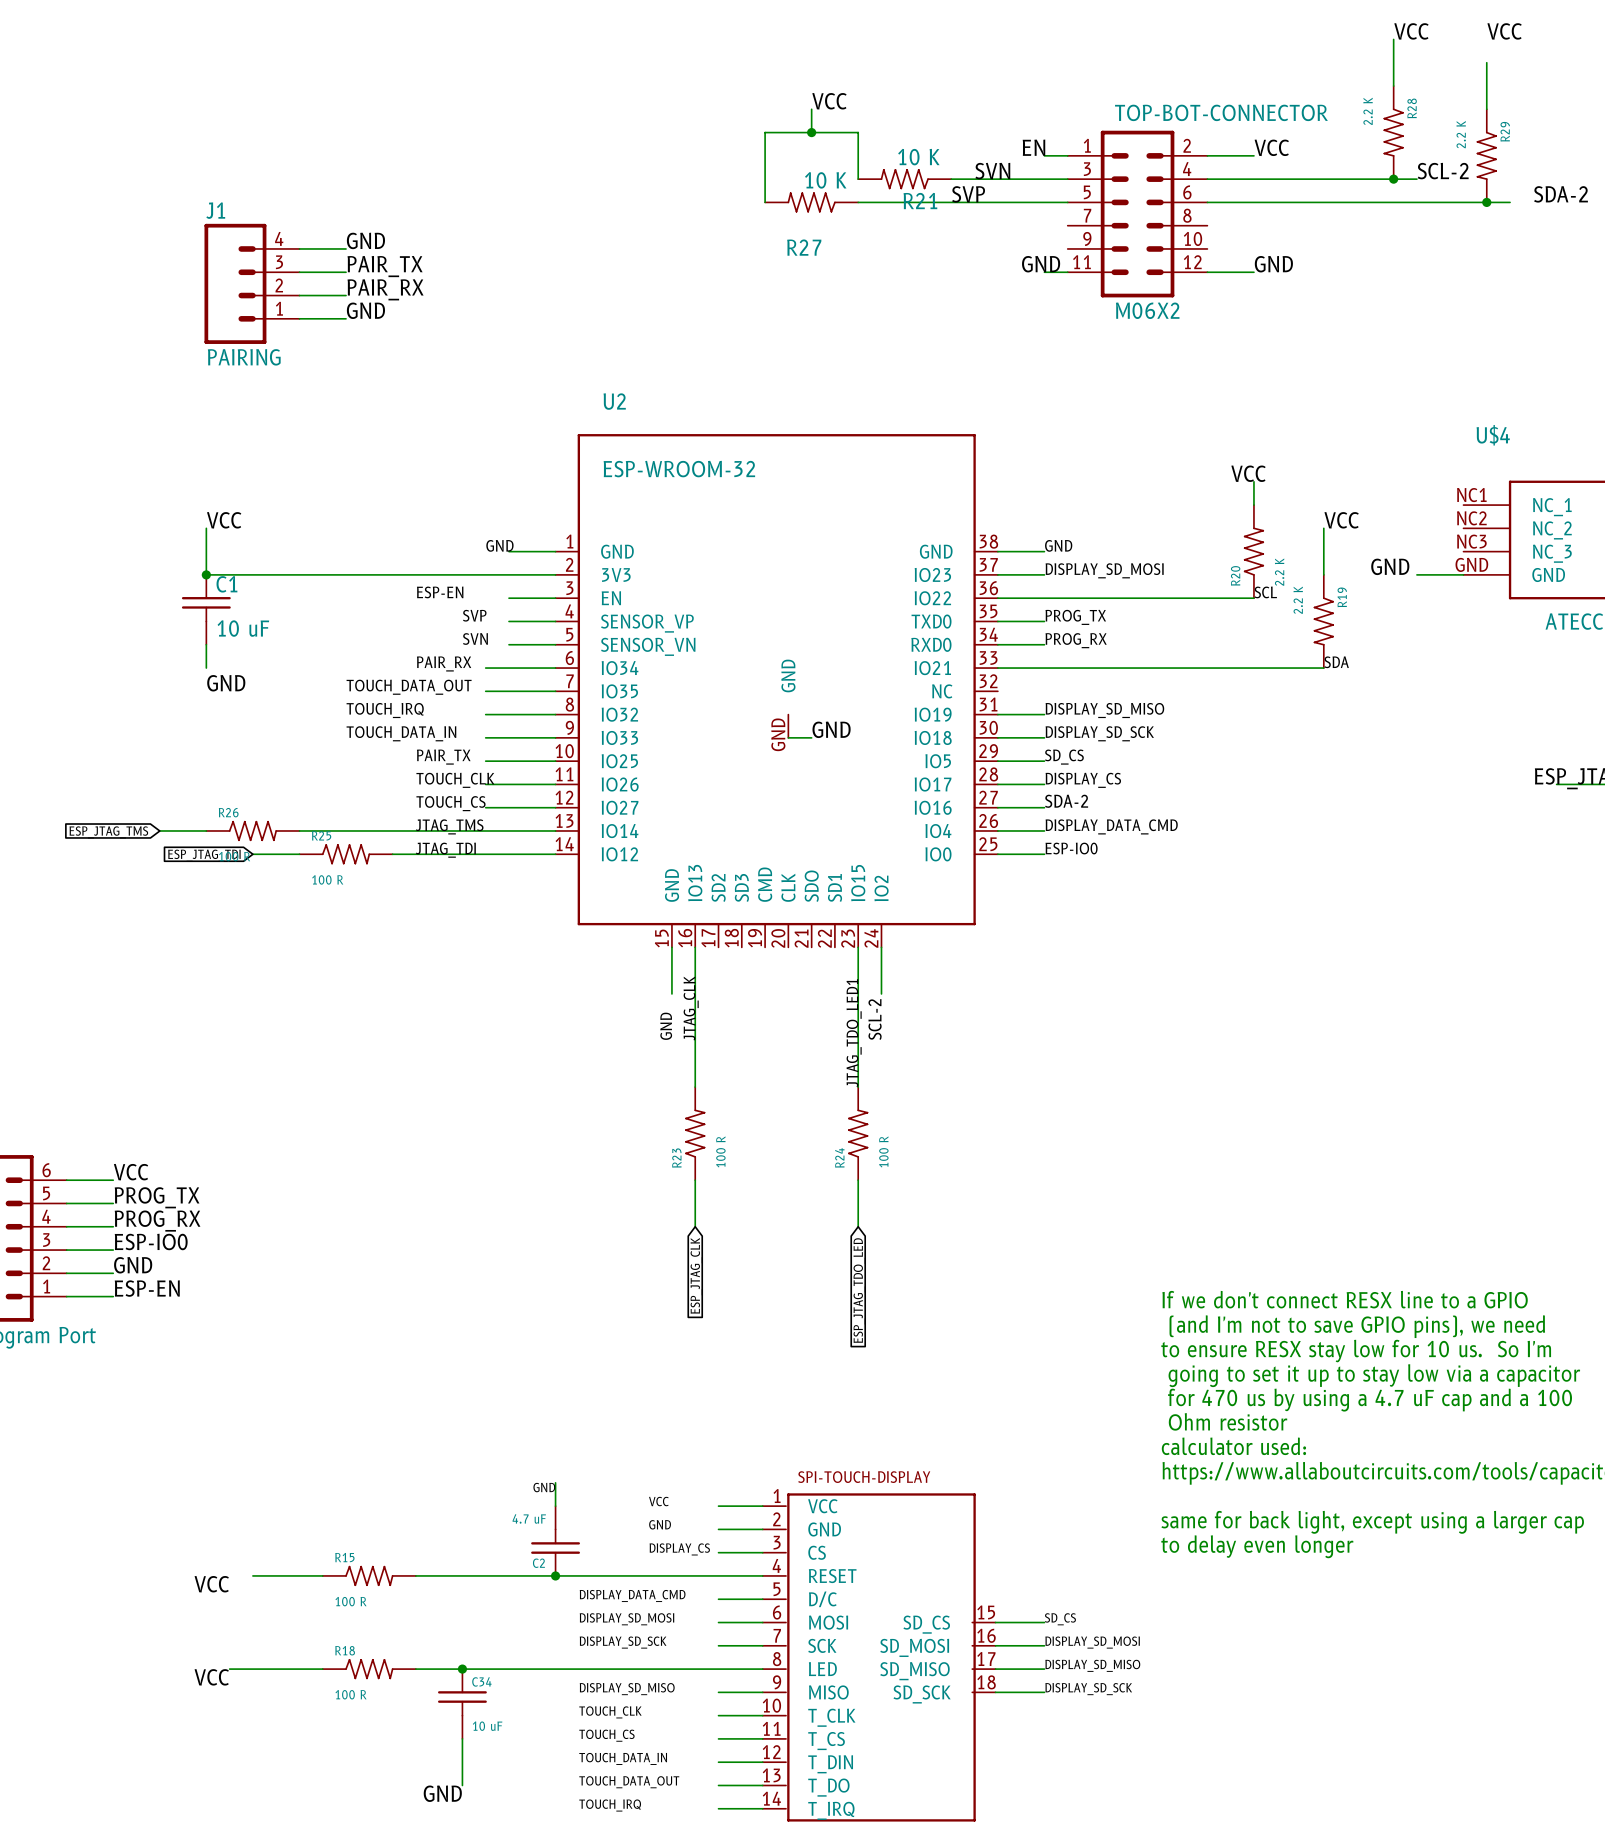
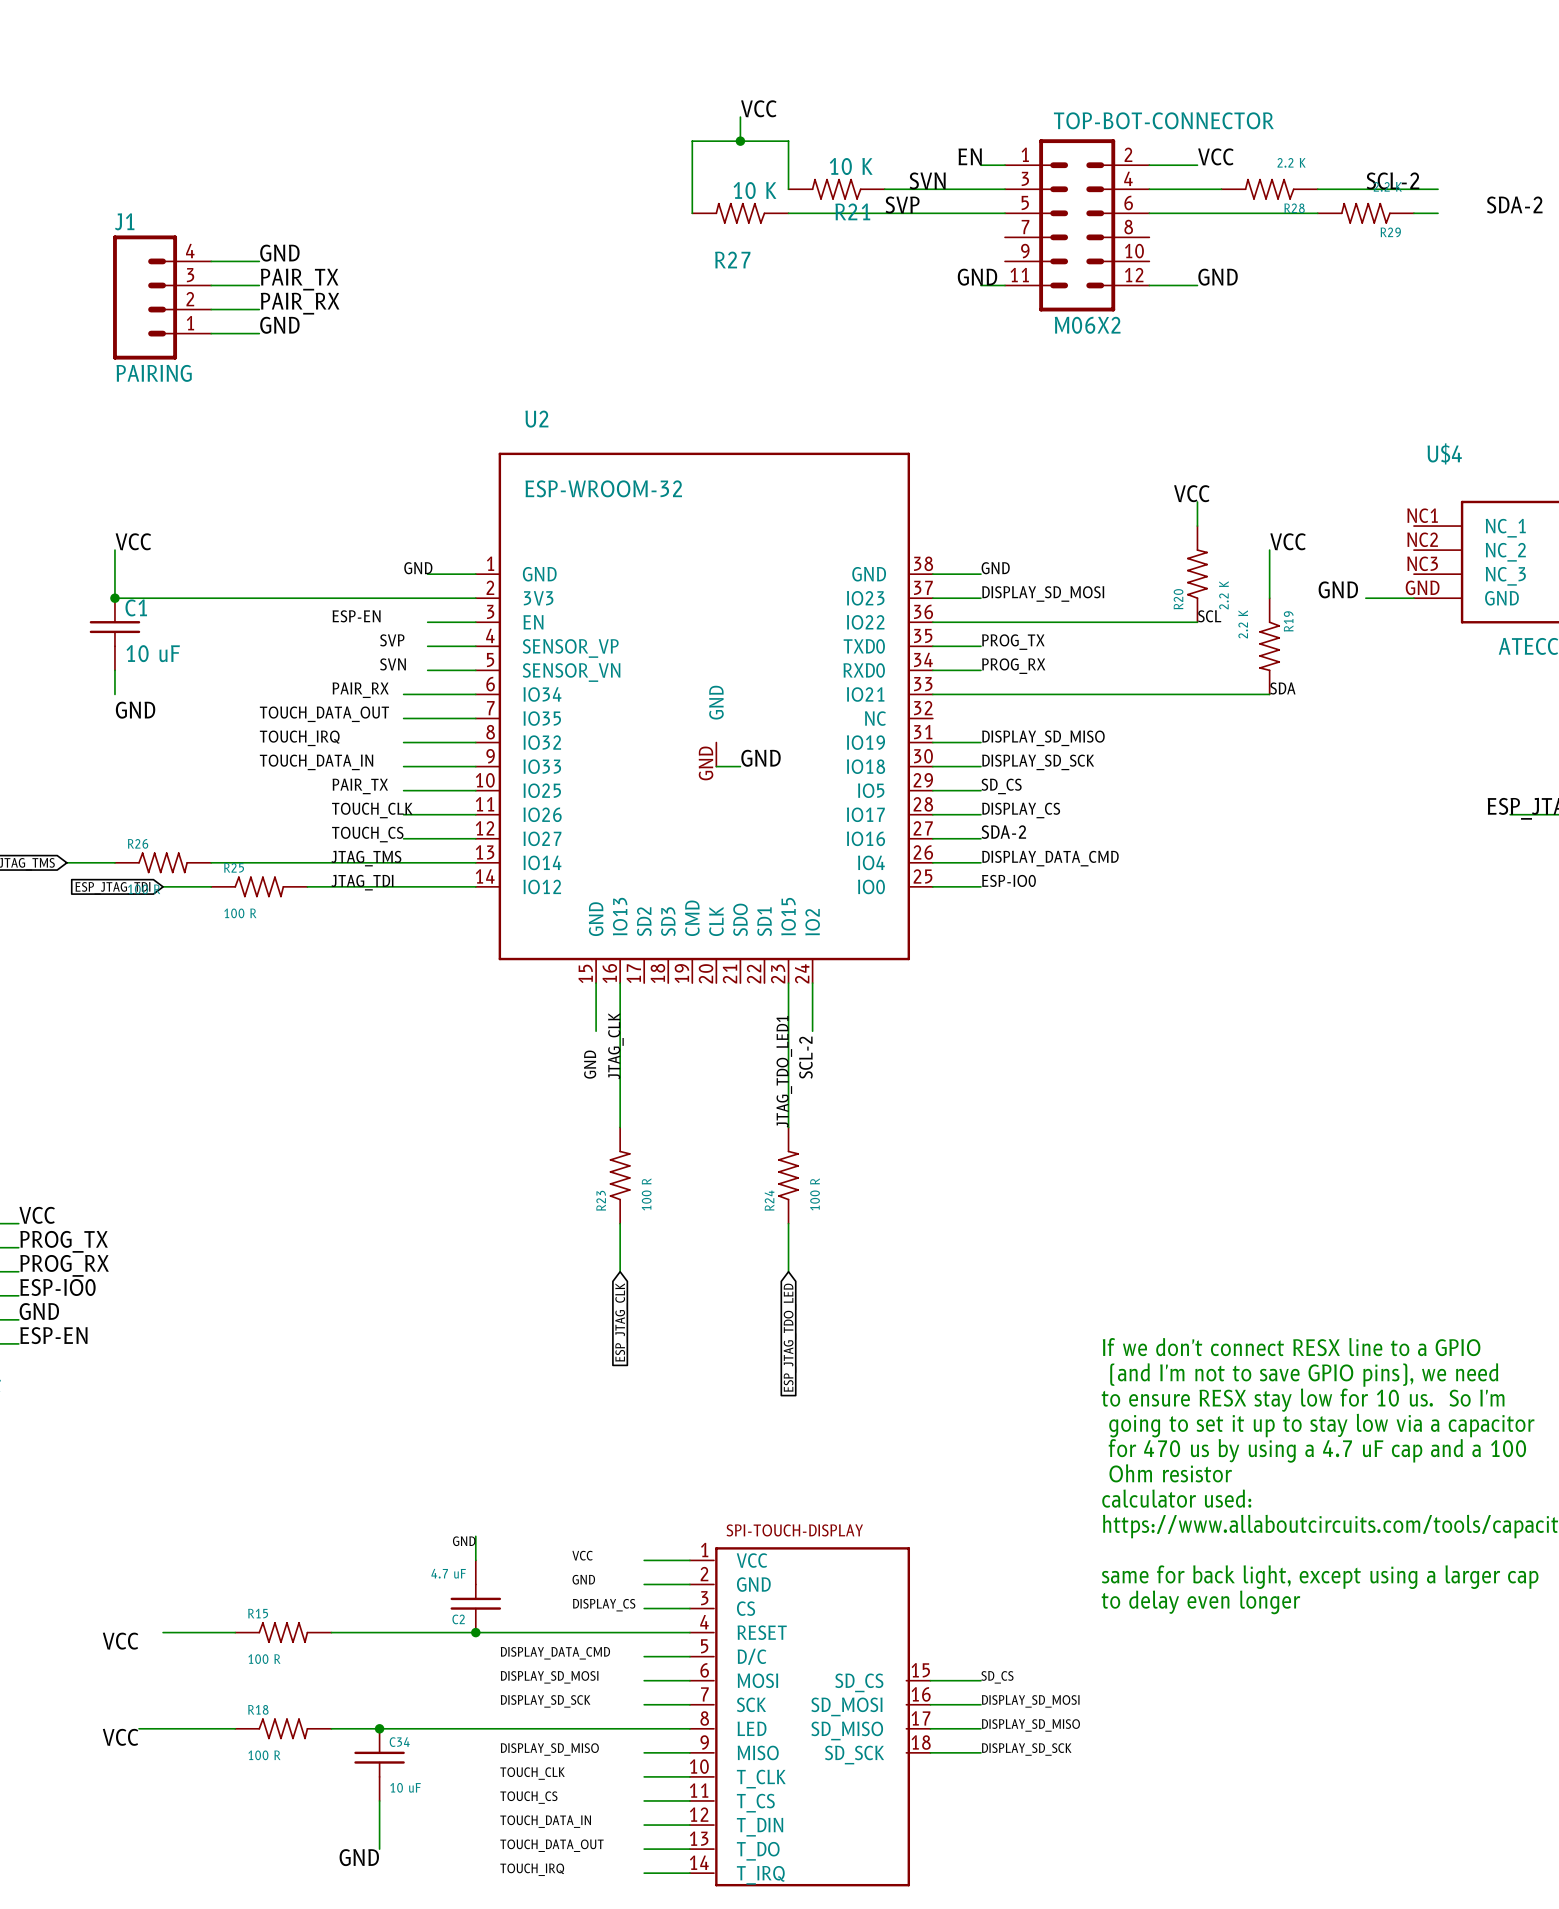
label: VCC (1411, 31) -> none
label: VCC (1504, 31) -> none
wire: (1393, 39) (1393, 86) -> none
wire: (1486, 62) (1486, 109) -> none
R28 rotation: 0° (1393, 132) -> 90° clockwise (1269, 189)
R28 position: (1393, 132) -> (1269, 189)
R29 rotation: 0° (1486, 155) -> 90° clockwise (1365, 213)
R29 position: (1486, 155) -> (1365, 213)
junction: (1393, 179) -> none
wire: none -> (1365, 189) (1438, 189)
wire: (1486, 202) (1510, 202) -> none
junction: (1486, 202) -> none

